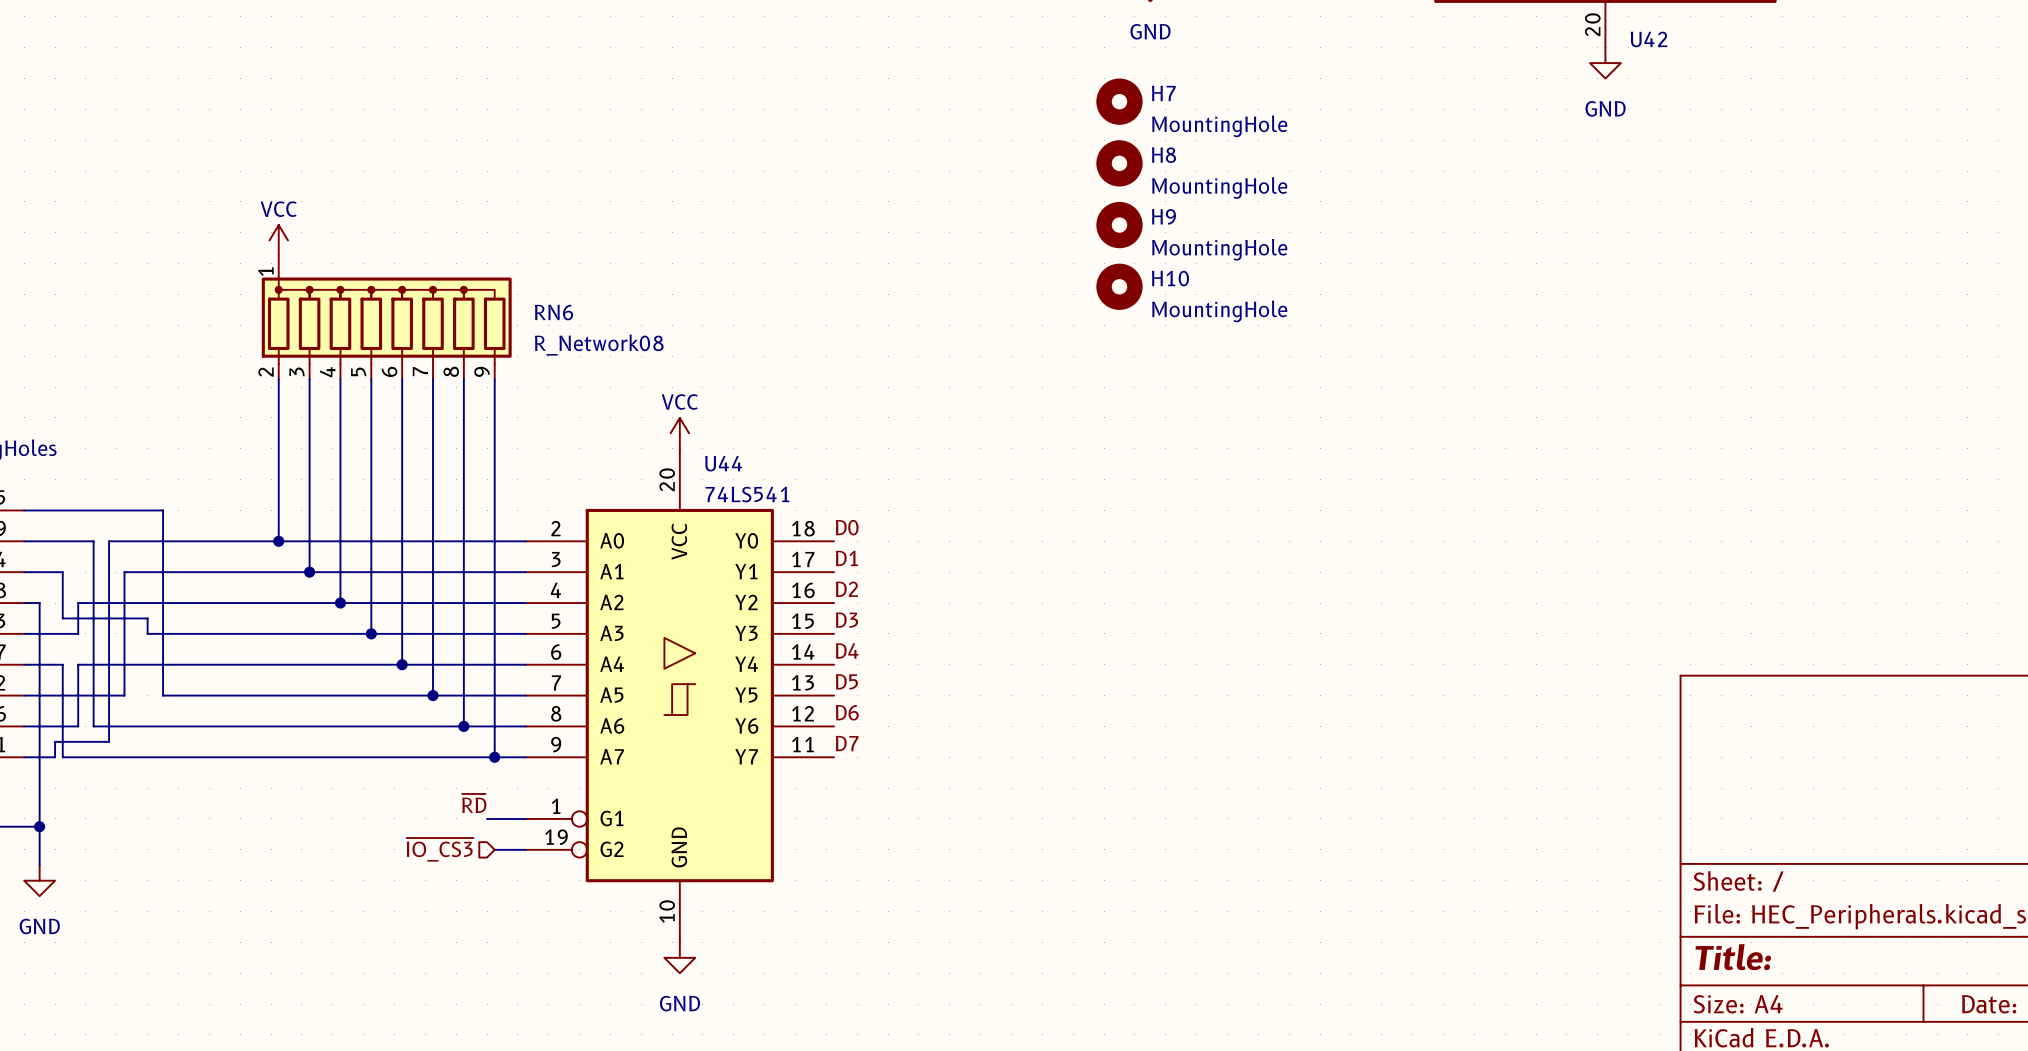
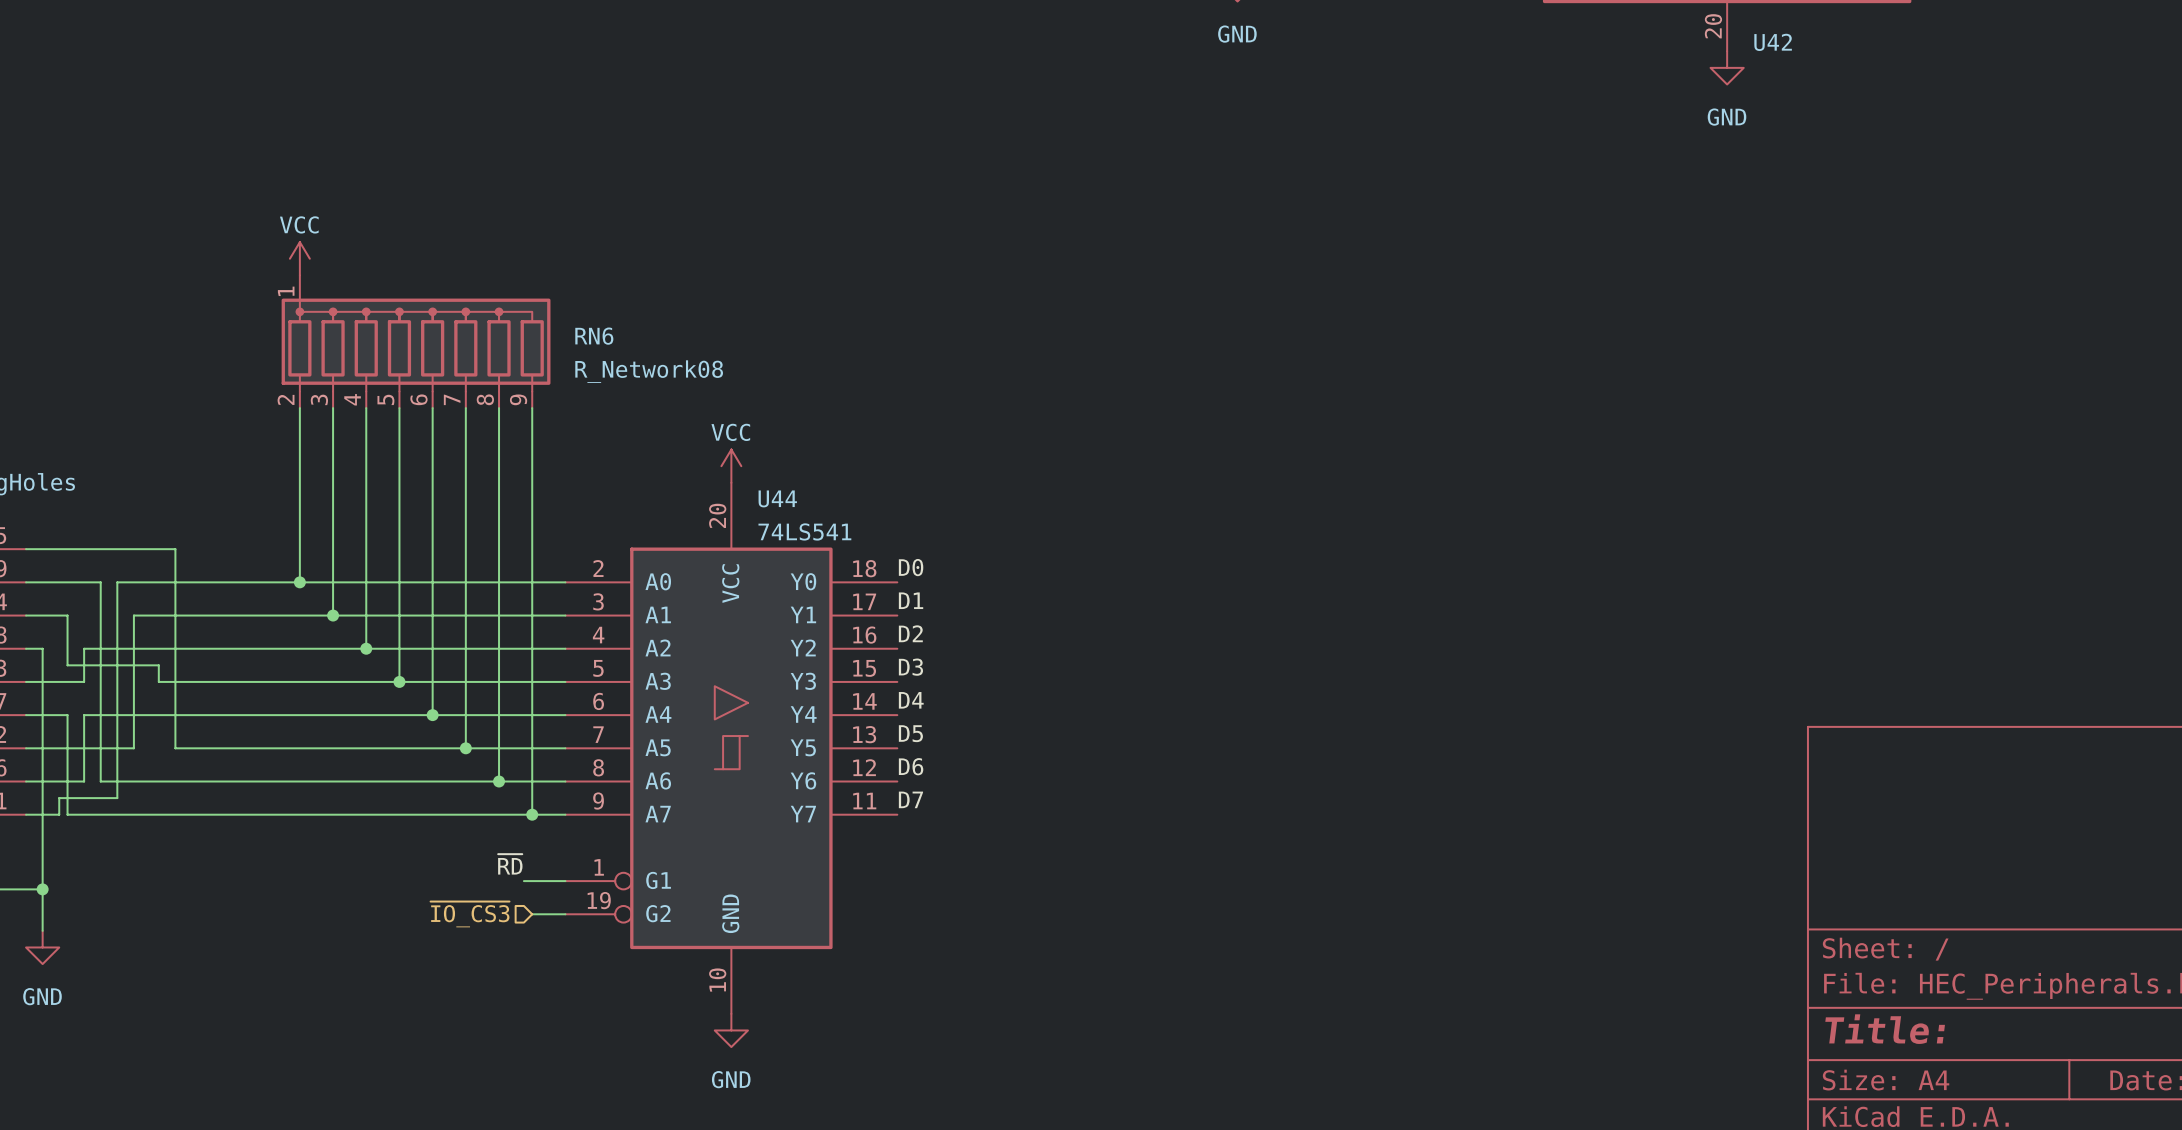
H7: MountingHole (1119, 101) -> none
H8: MountingHole (1119, 163) -> none
H9: MountingHole (1119, 225) -> none
H10: MountingHole (1119, 286) -> none

